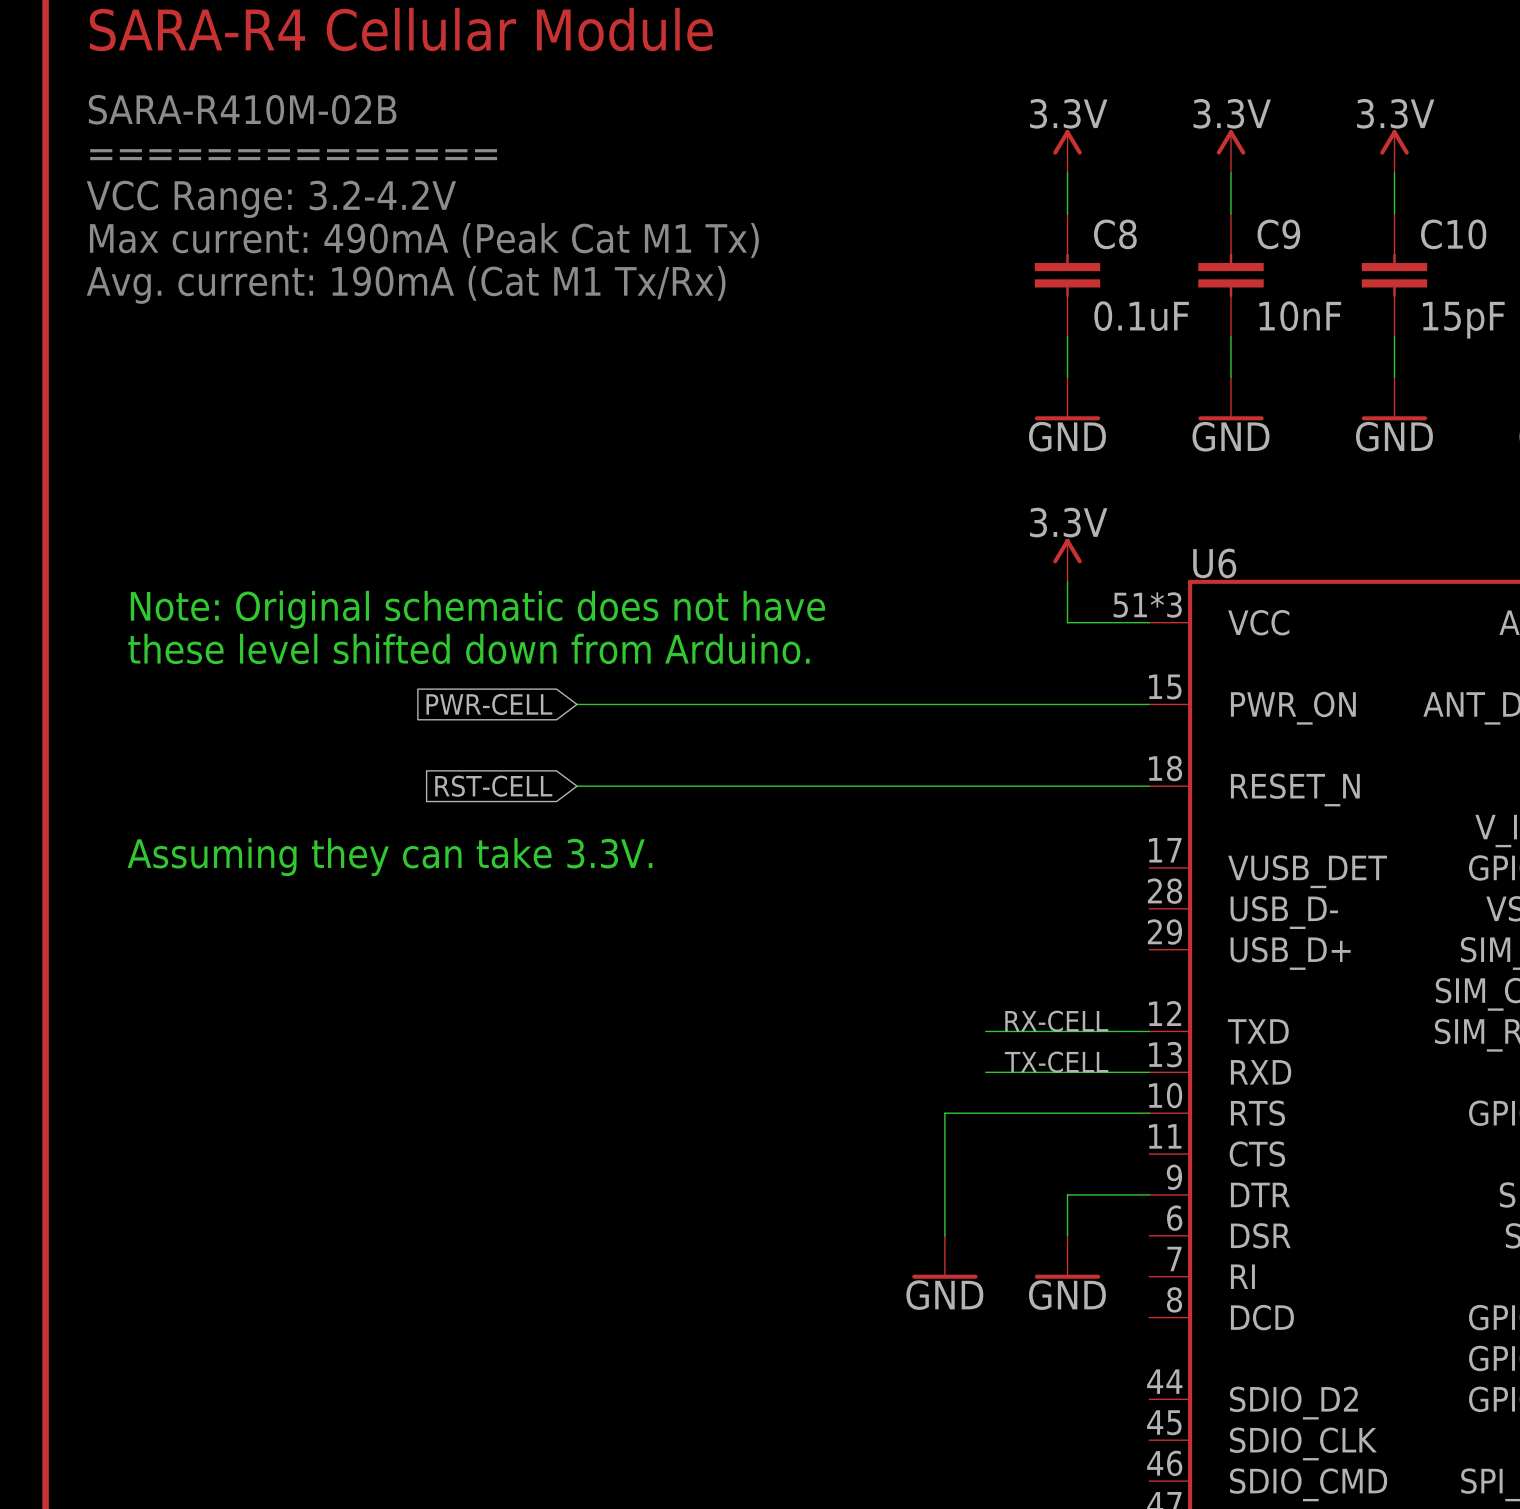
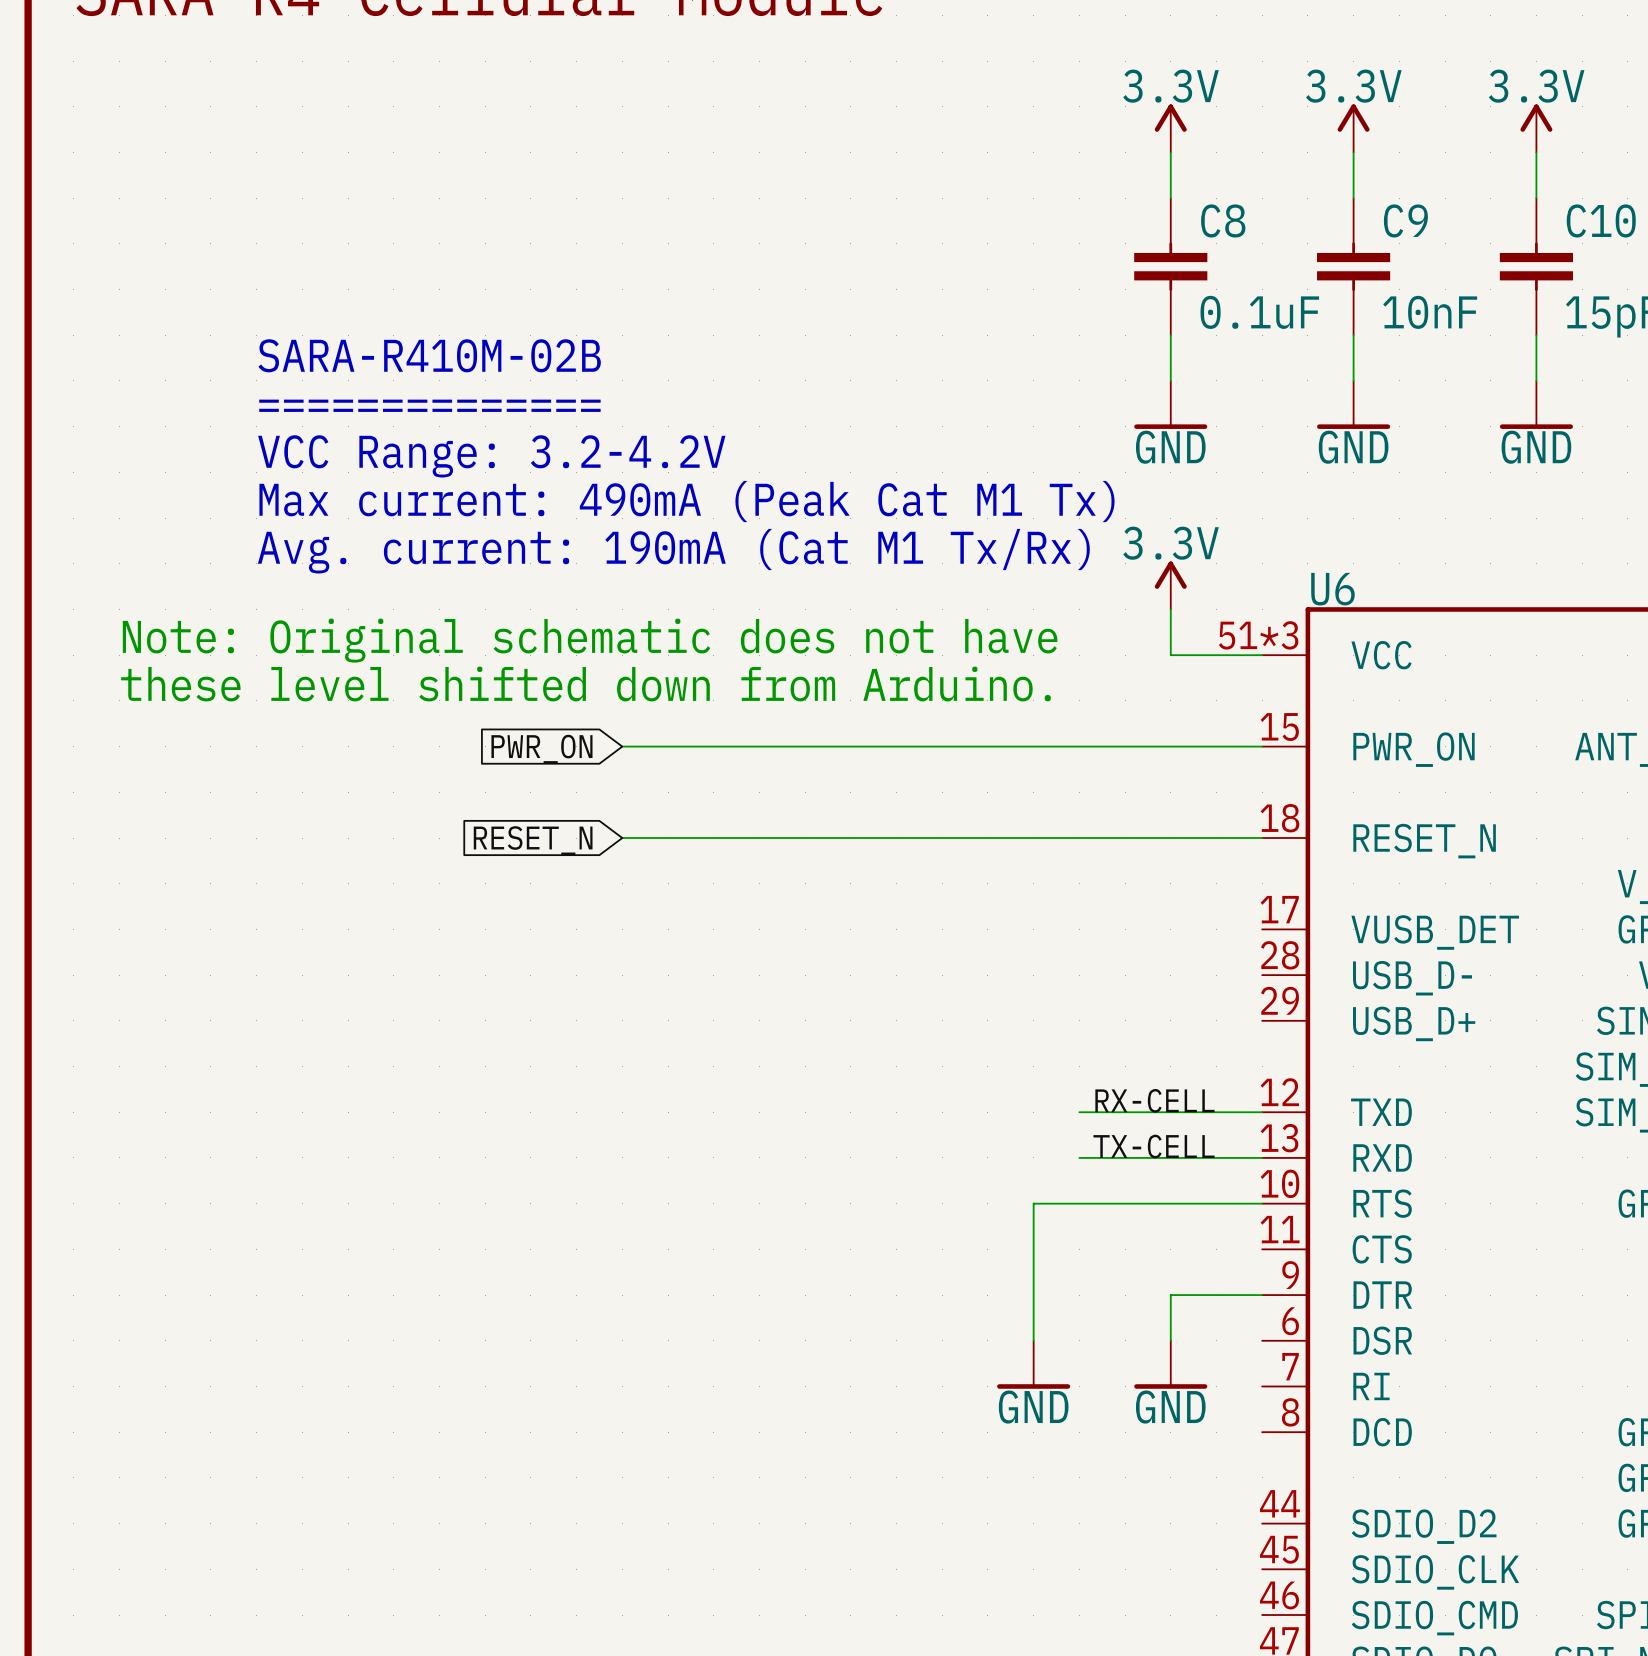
text position: SARA-R410M-02B (242, 109) -> SARA-R410M-02B (429, 355)
text position: ============== (293, 154) -> ============== (429, 405)
text position: VCC Range: 3.2-4.2V (271, 199) -> VCC Range: 3.2-4.2V (491, 456)
text position: Max current: 490mA (Peak Cat M1 Tx) (424, 240) -> Max current: 490mA (Peak Cat M1 Tx) (687, 501)
text position: Avg. current: 190mA (Cat M1 Tx/Rx) (406, 284) -> Avg. current: 190mA (Cat M1 Tx/Rx) (673, 551)
global label: PWR-CELL (489, 704) -> PWR_ON (541, 749)
global label: RST-CELL (493, 786) -> RESET_N (533, 840)
text: Assuming they can take 3.3V. (390, 857) -> none

